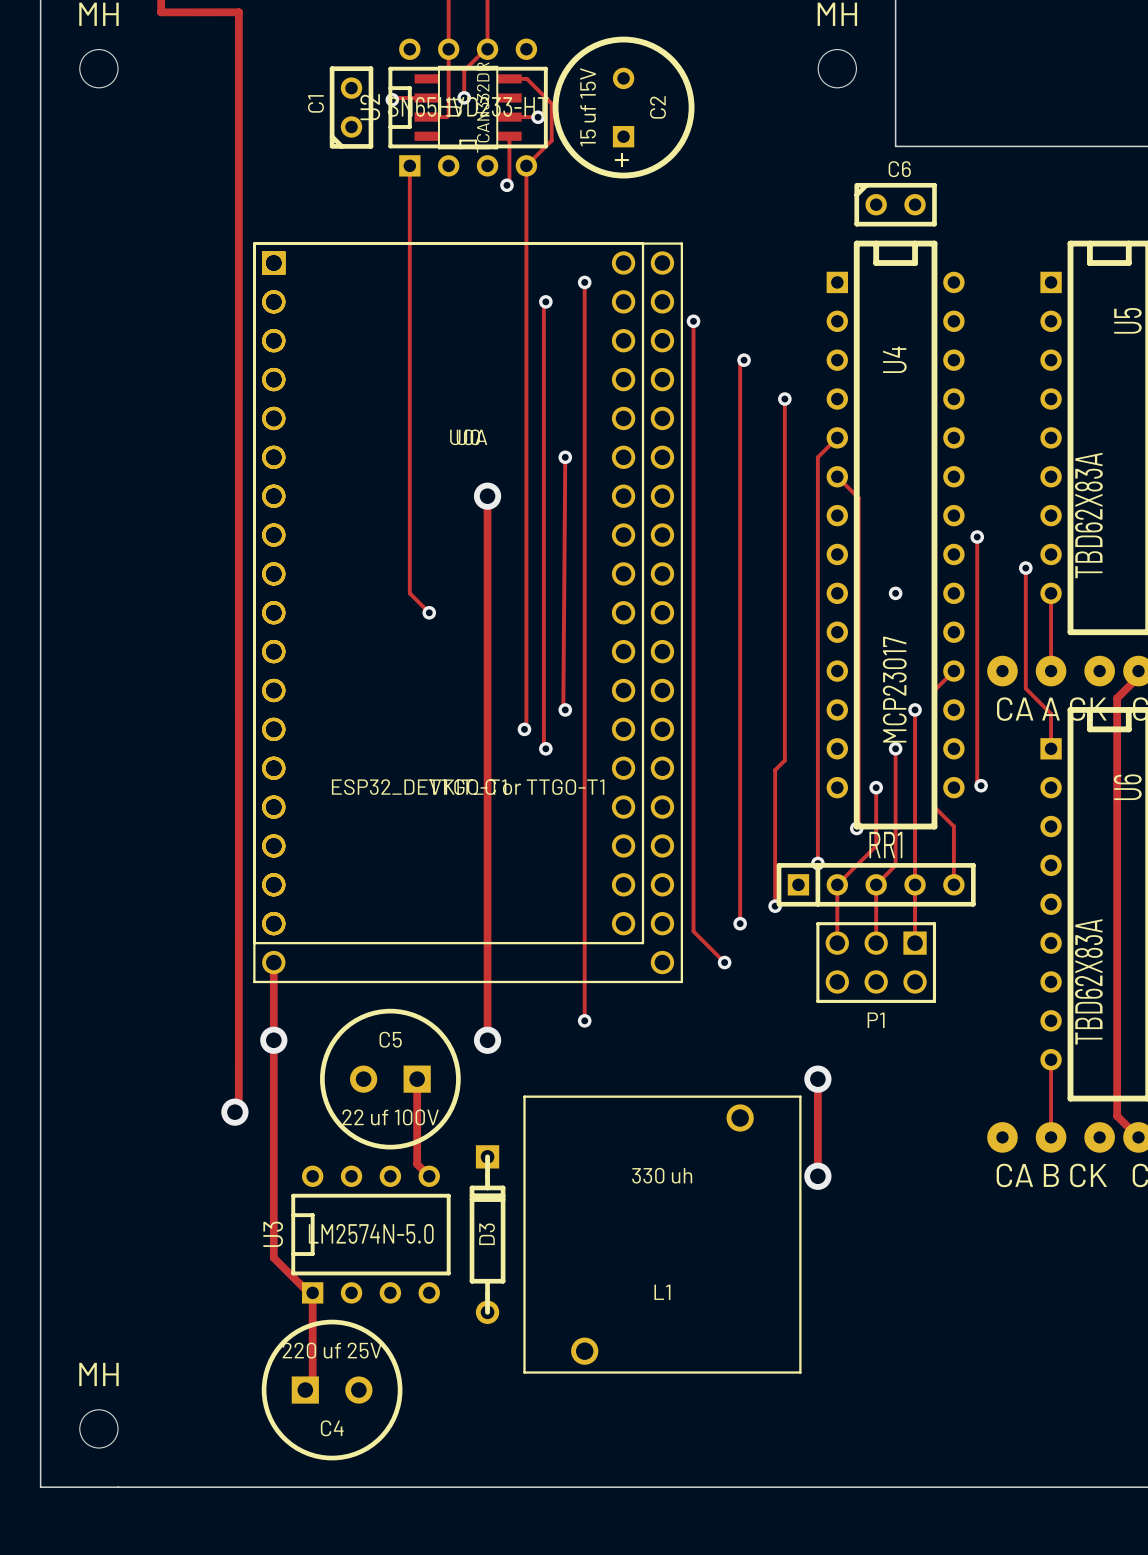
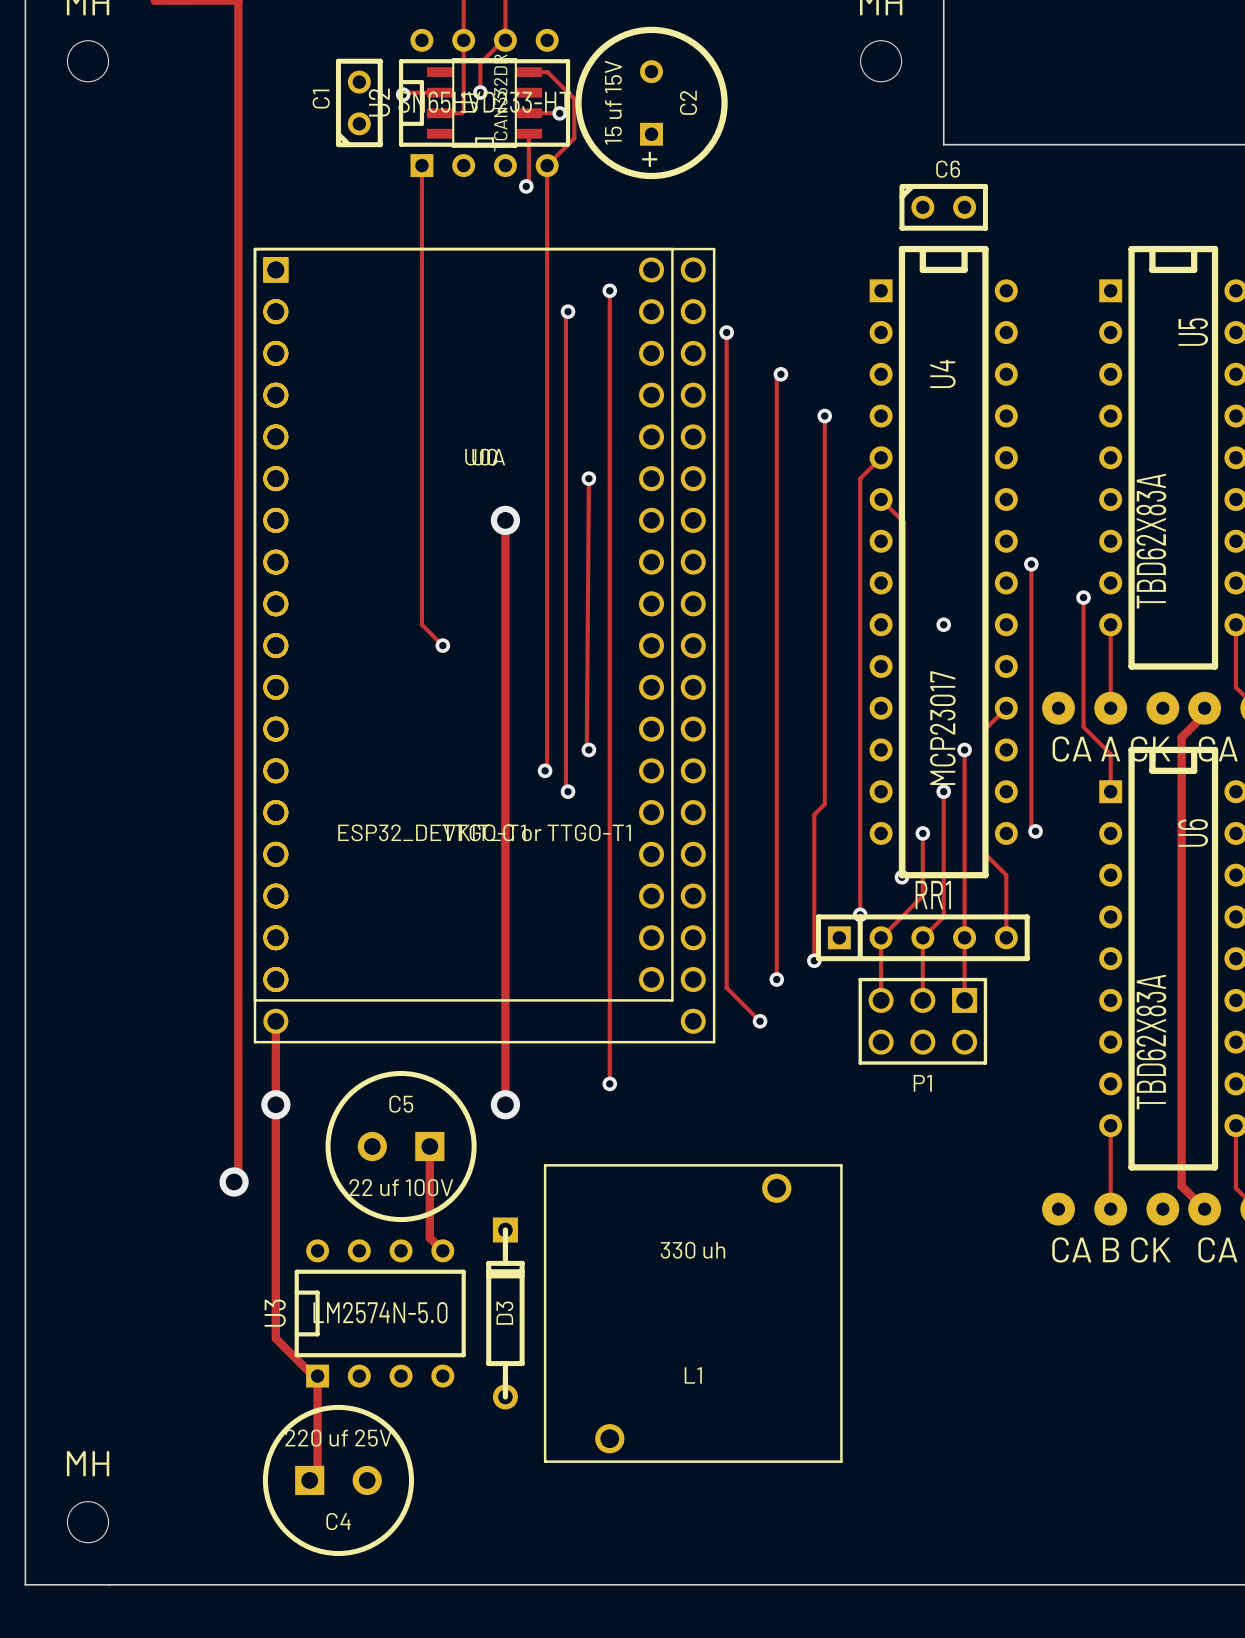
track: (817, 1079) (817, 1176) -> none
via: (817, 1079) -> none
via: (817, 1176) -> none

